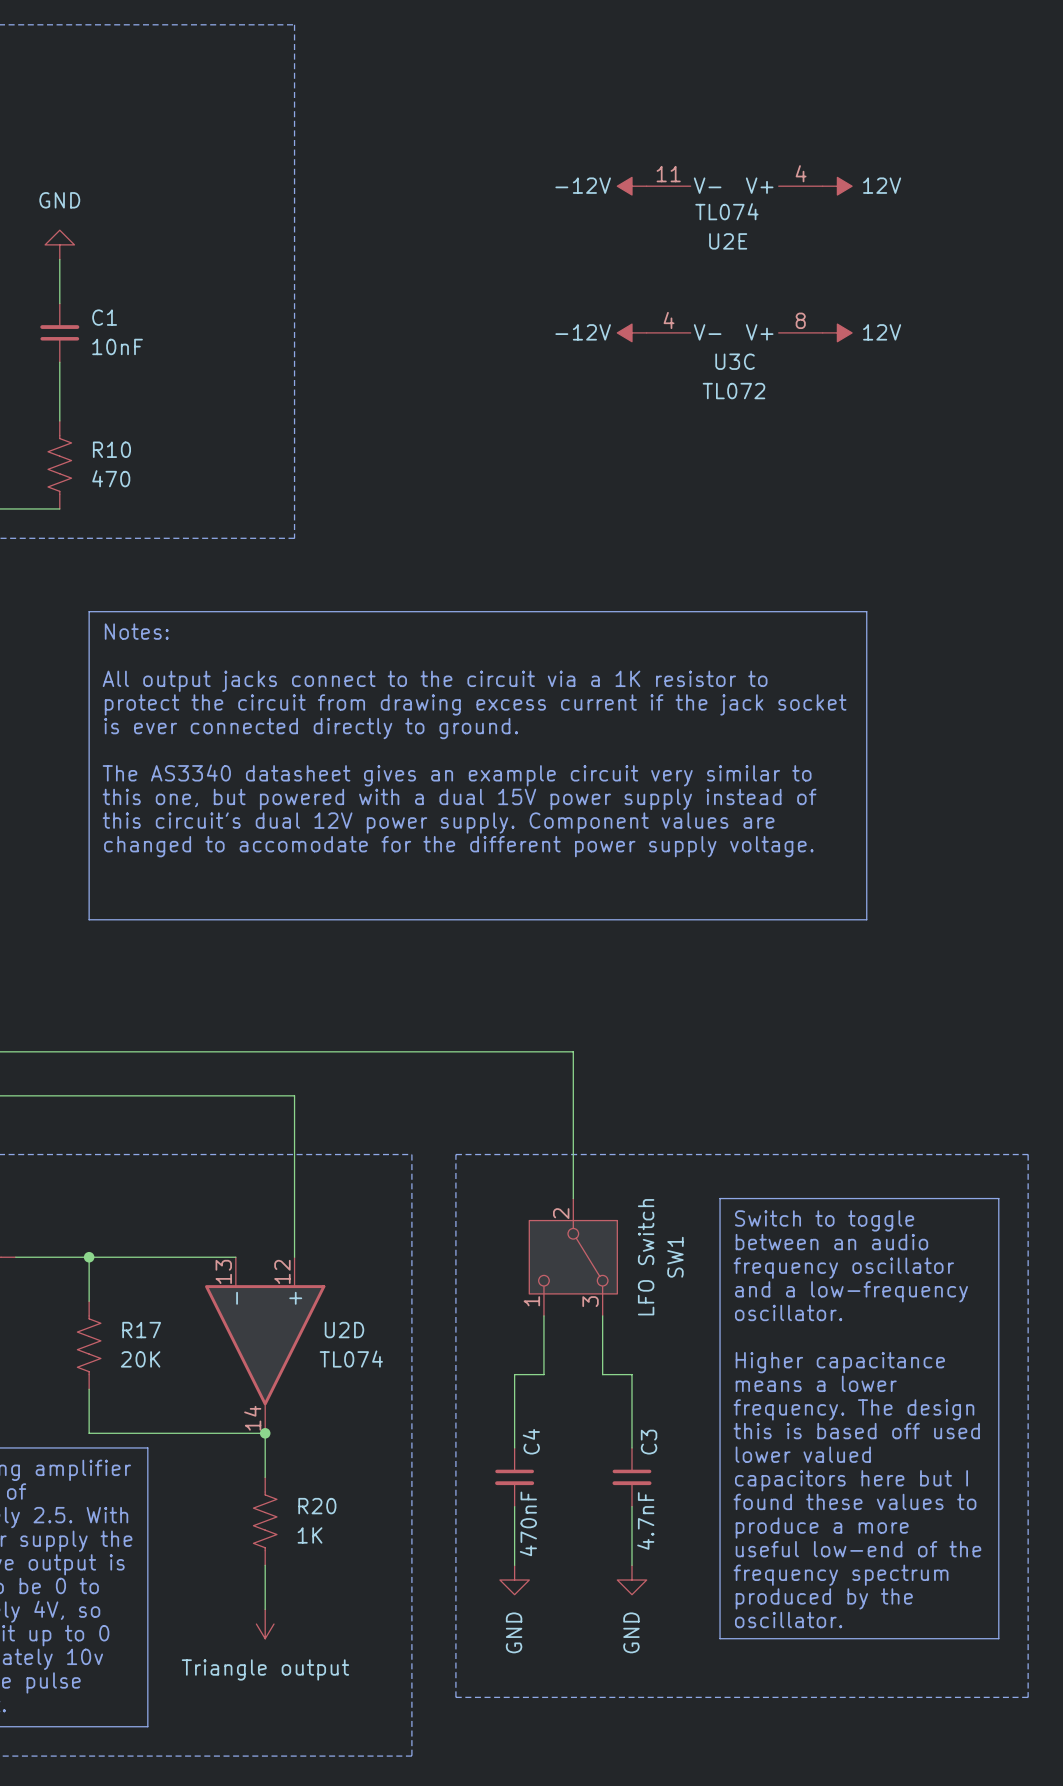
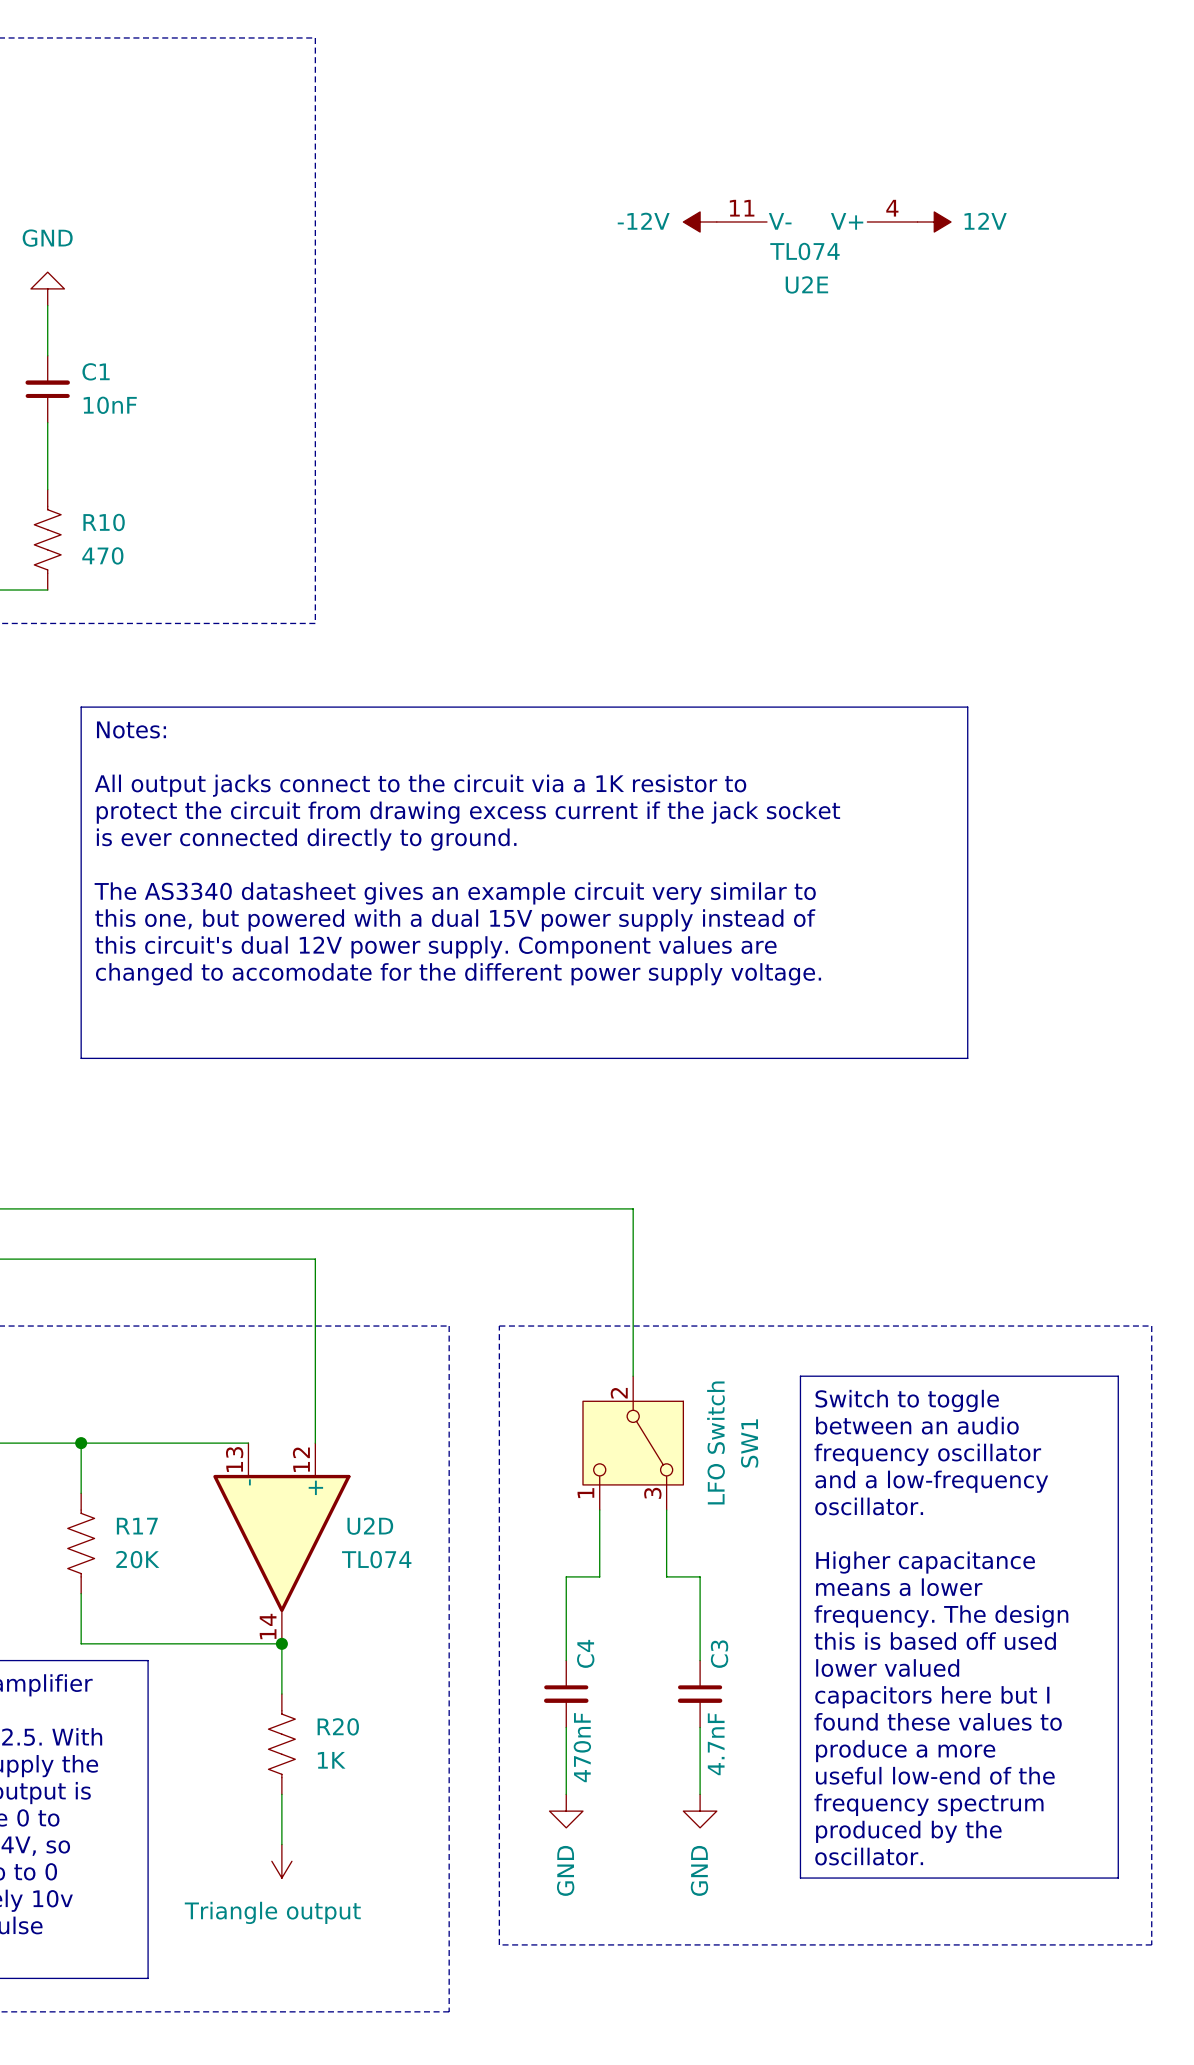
power symbol: -12V (631, 332) -> none
U3C: TL072 (734, 332) -> none
power symbol: 12V (837, 332) -> none

